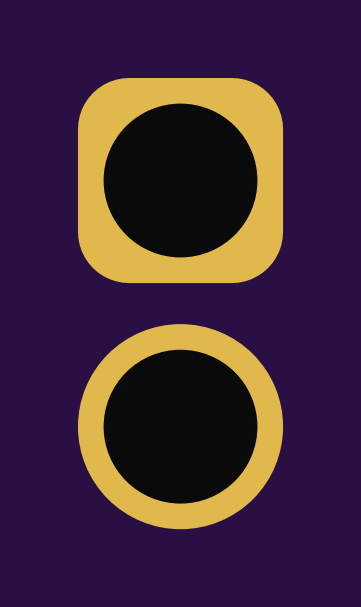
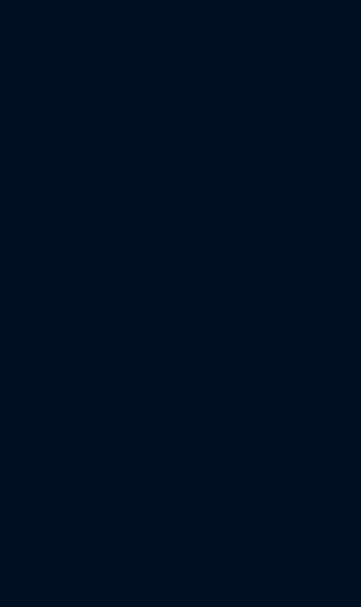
part: (180, 303) -> none

